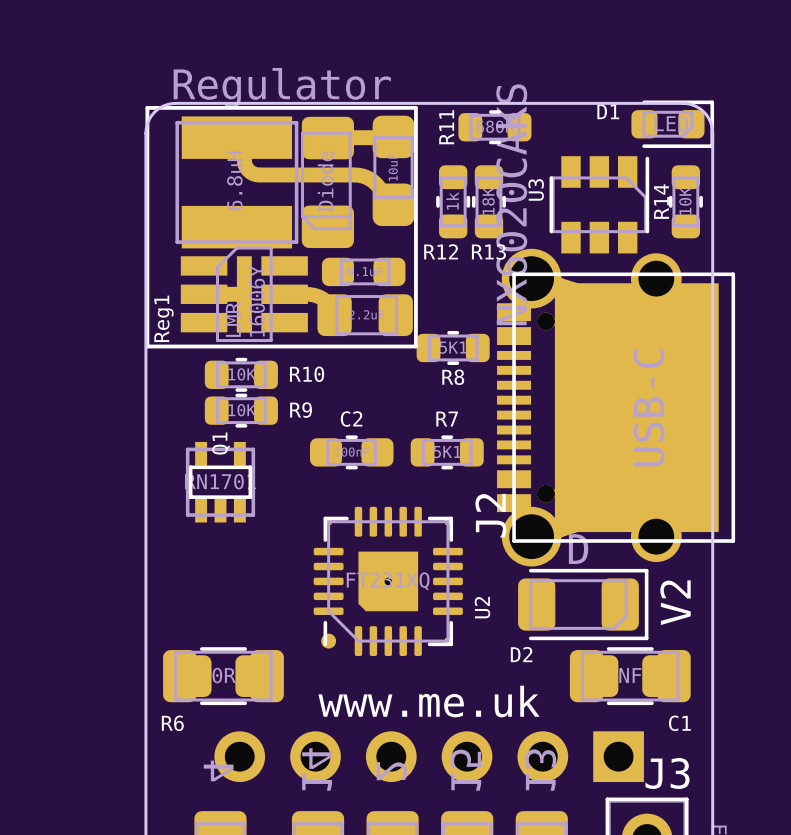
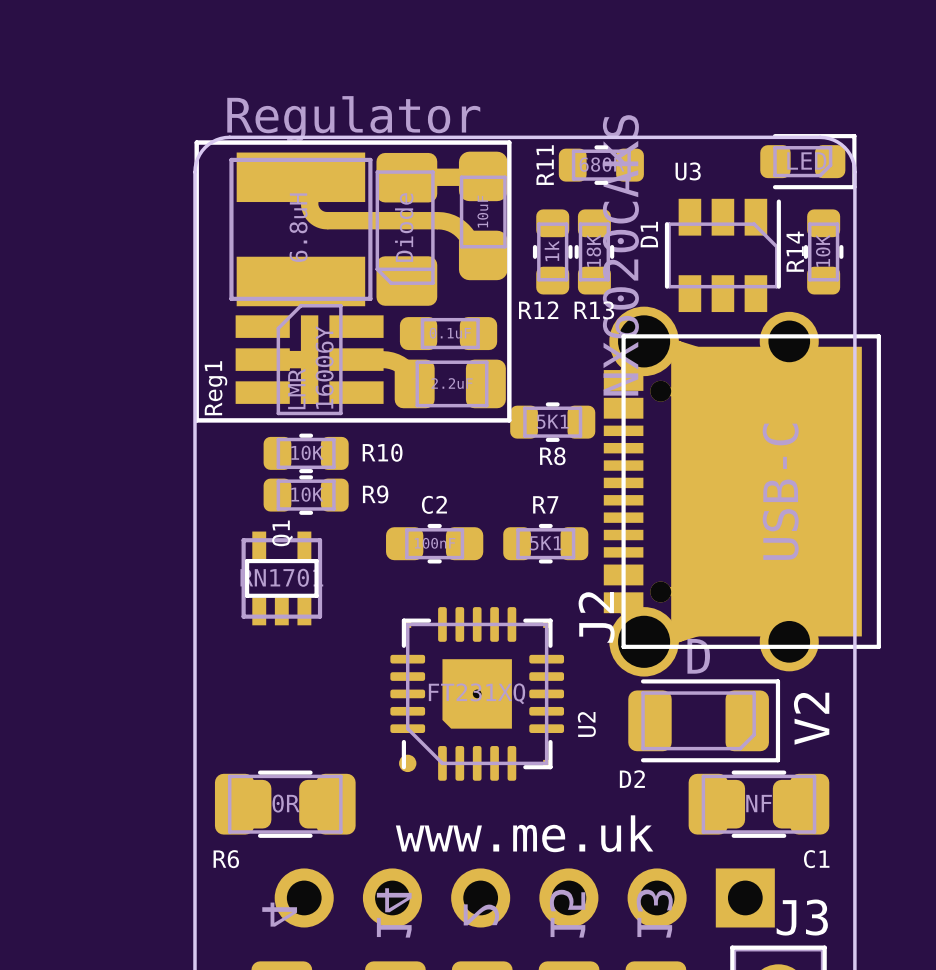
D1 name rotation: 0° (608, 111) -> 90° counterclockwise (649, 234)
D1 name position: D1 (608, 111) -> D1 (649, 234)
U3 name rotation: 0° (536, 189) -> 90° clockwise (688, 171)
U3 name position: U3 (536, 189) -> U3 (688, 171)

